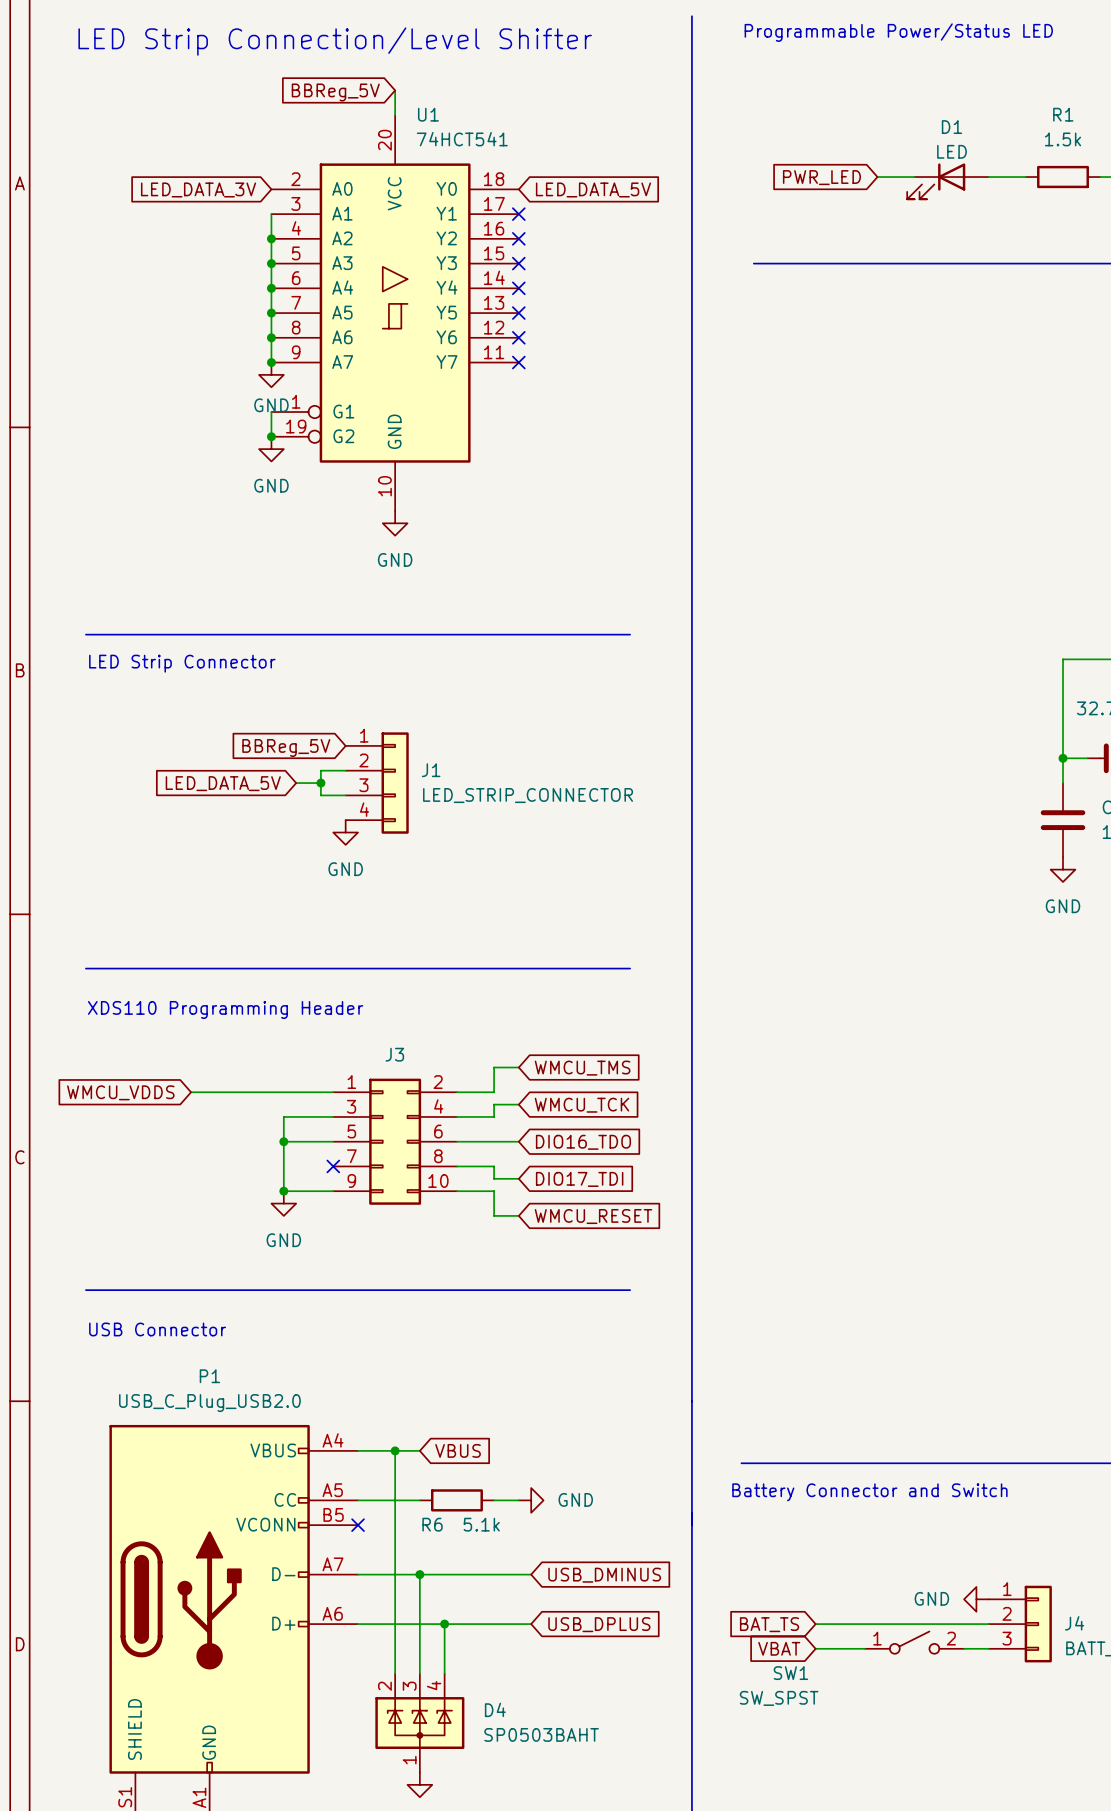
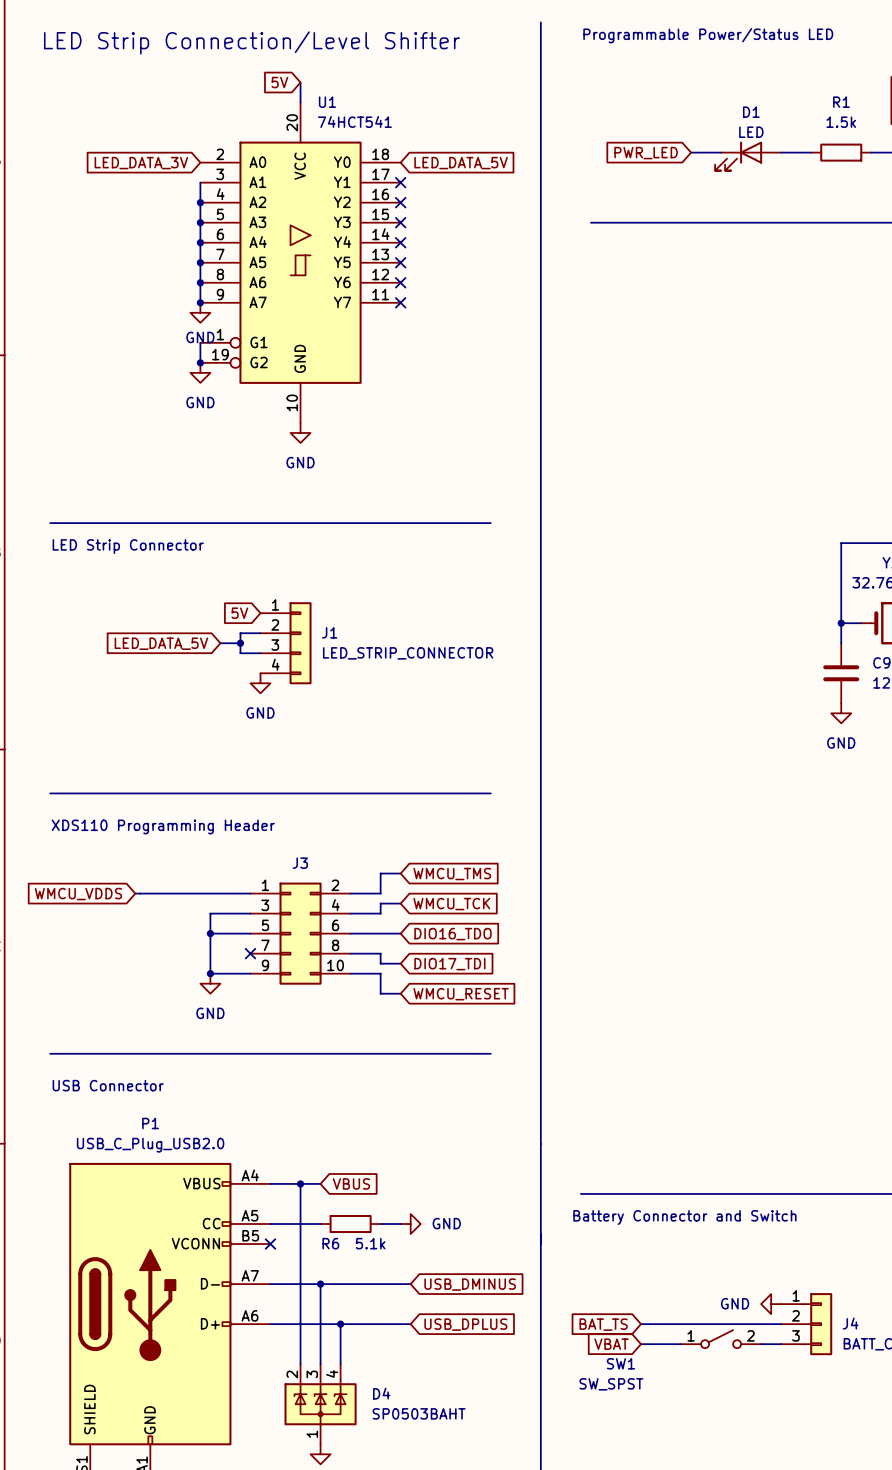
global label: BBReg_5V (335, 92) -> 5V (279, 82)
global label: BBReg_5V (286, 748) -> 5V (239, 613)

